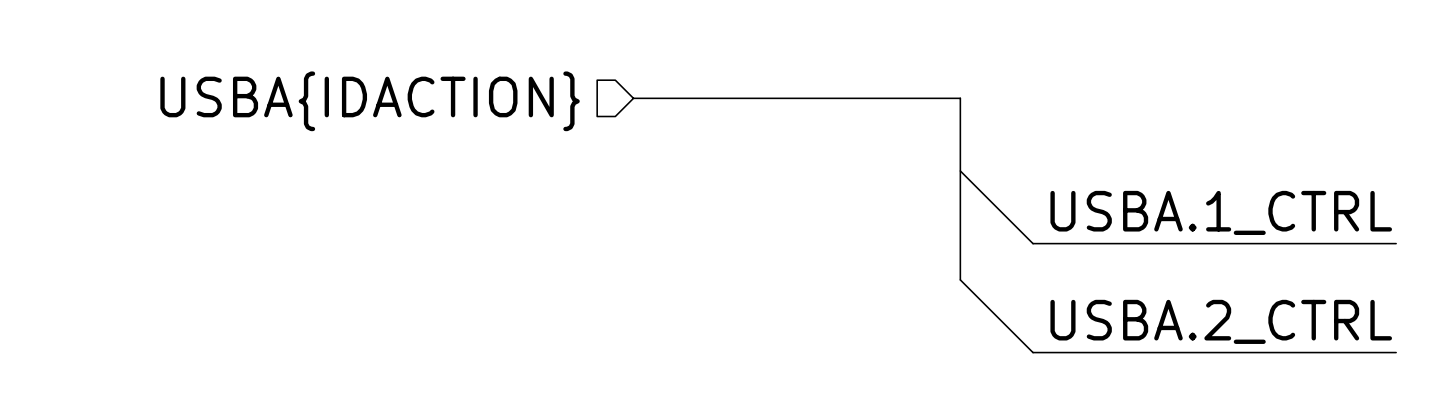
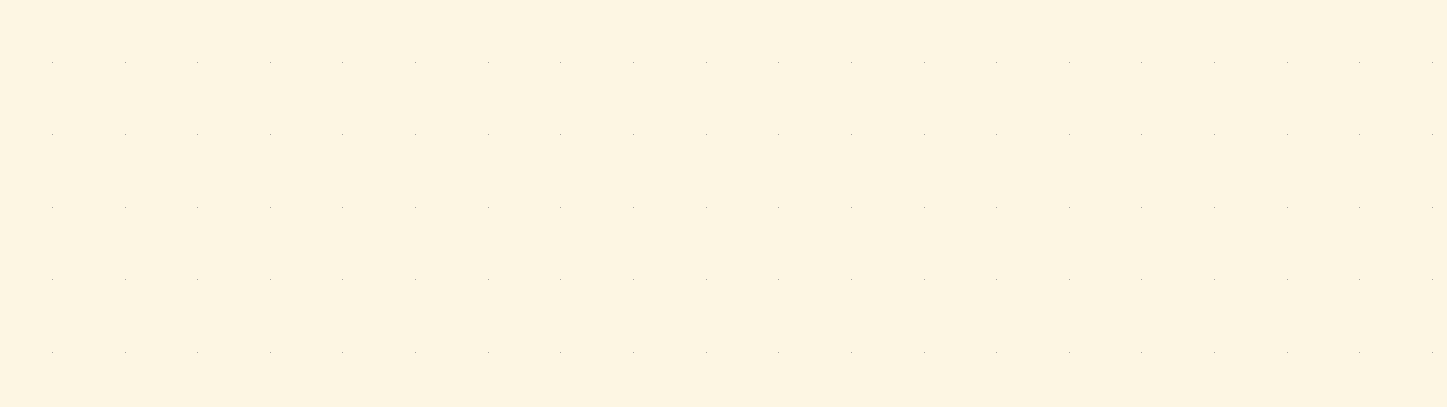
bus: (633, 98) (960, 98) (960, 279) -> none
hierarchical label: USBA{IDACTION} (370, 101) -> none
wire: (960, 170) (1032, 243) (1396, 243) -> none
label: USBA.1_CTRL (1221, 212) -> none
wire: (960, 279) (1032, 352) (1396, 352) -> none
label: USBA.2_CTRL (1221, 321) -> none

